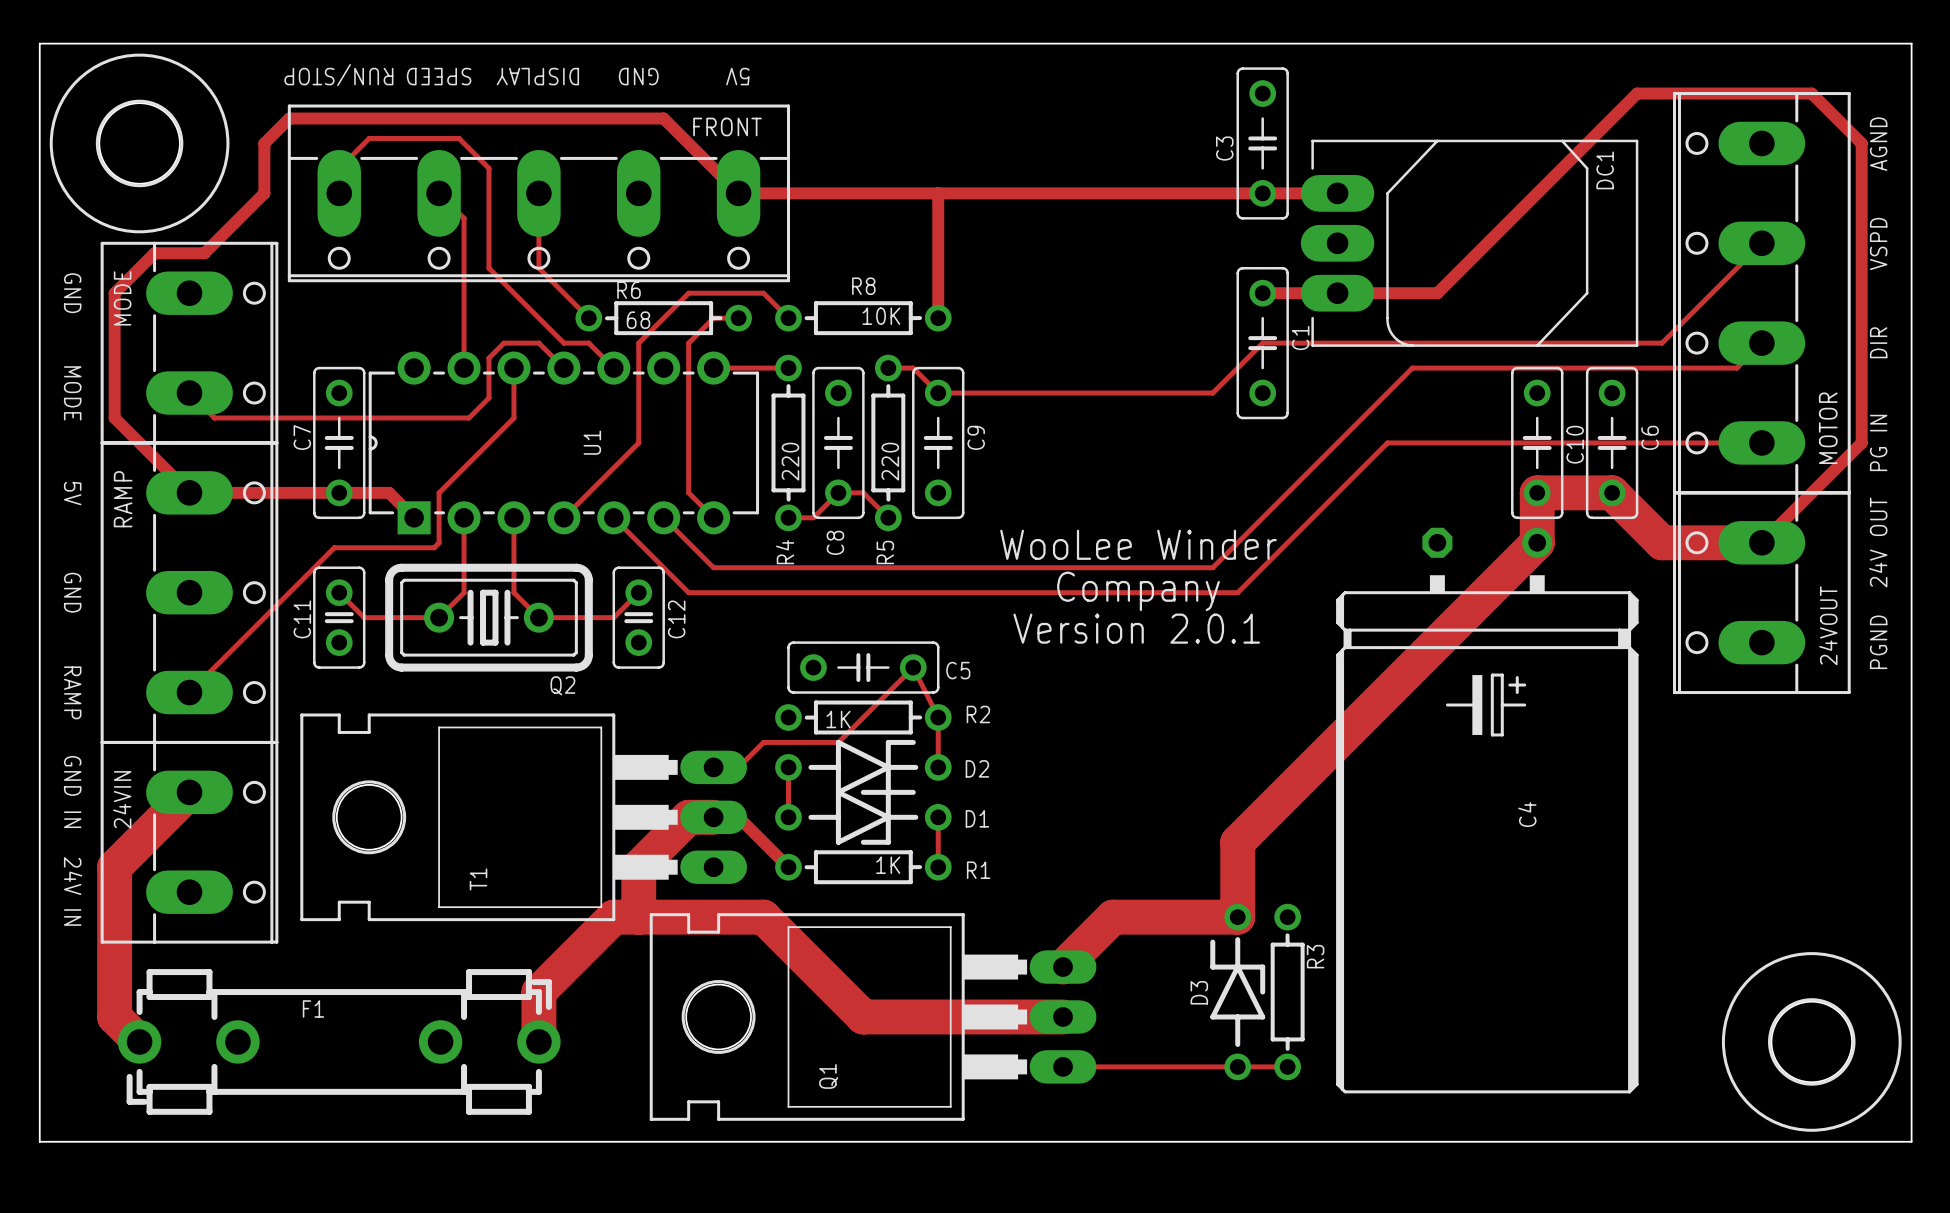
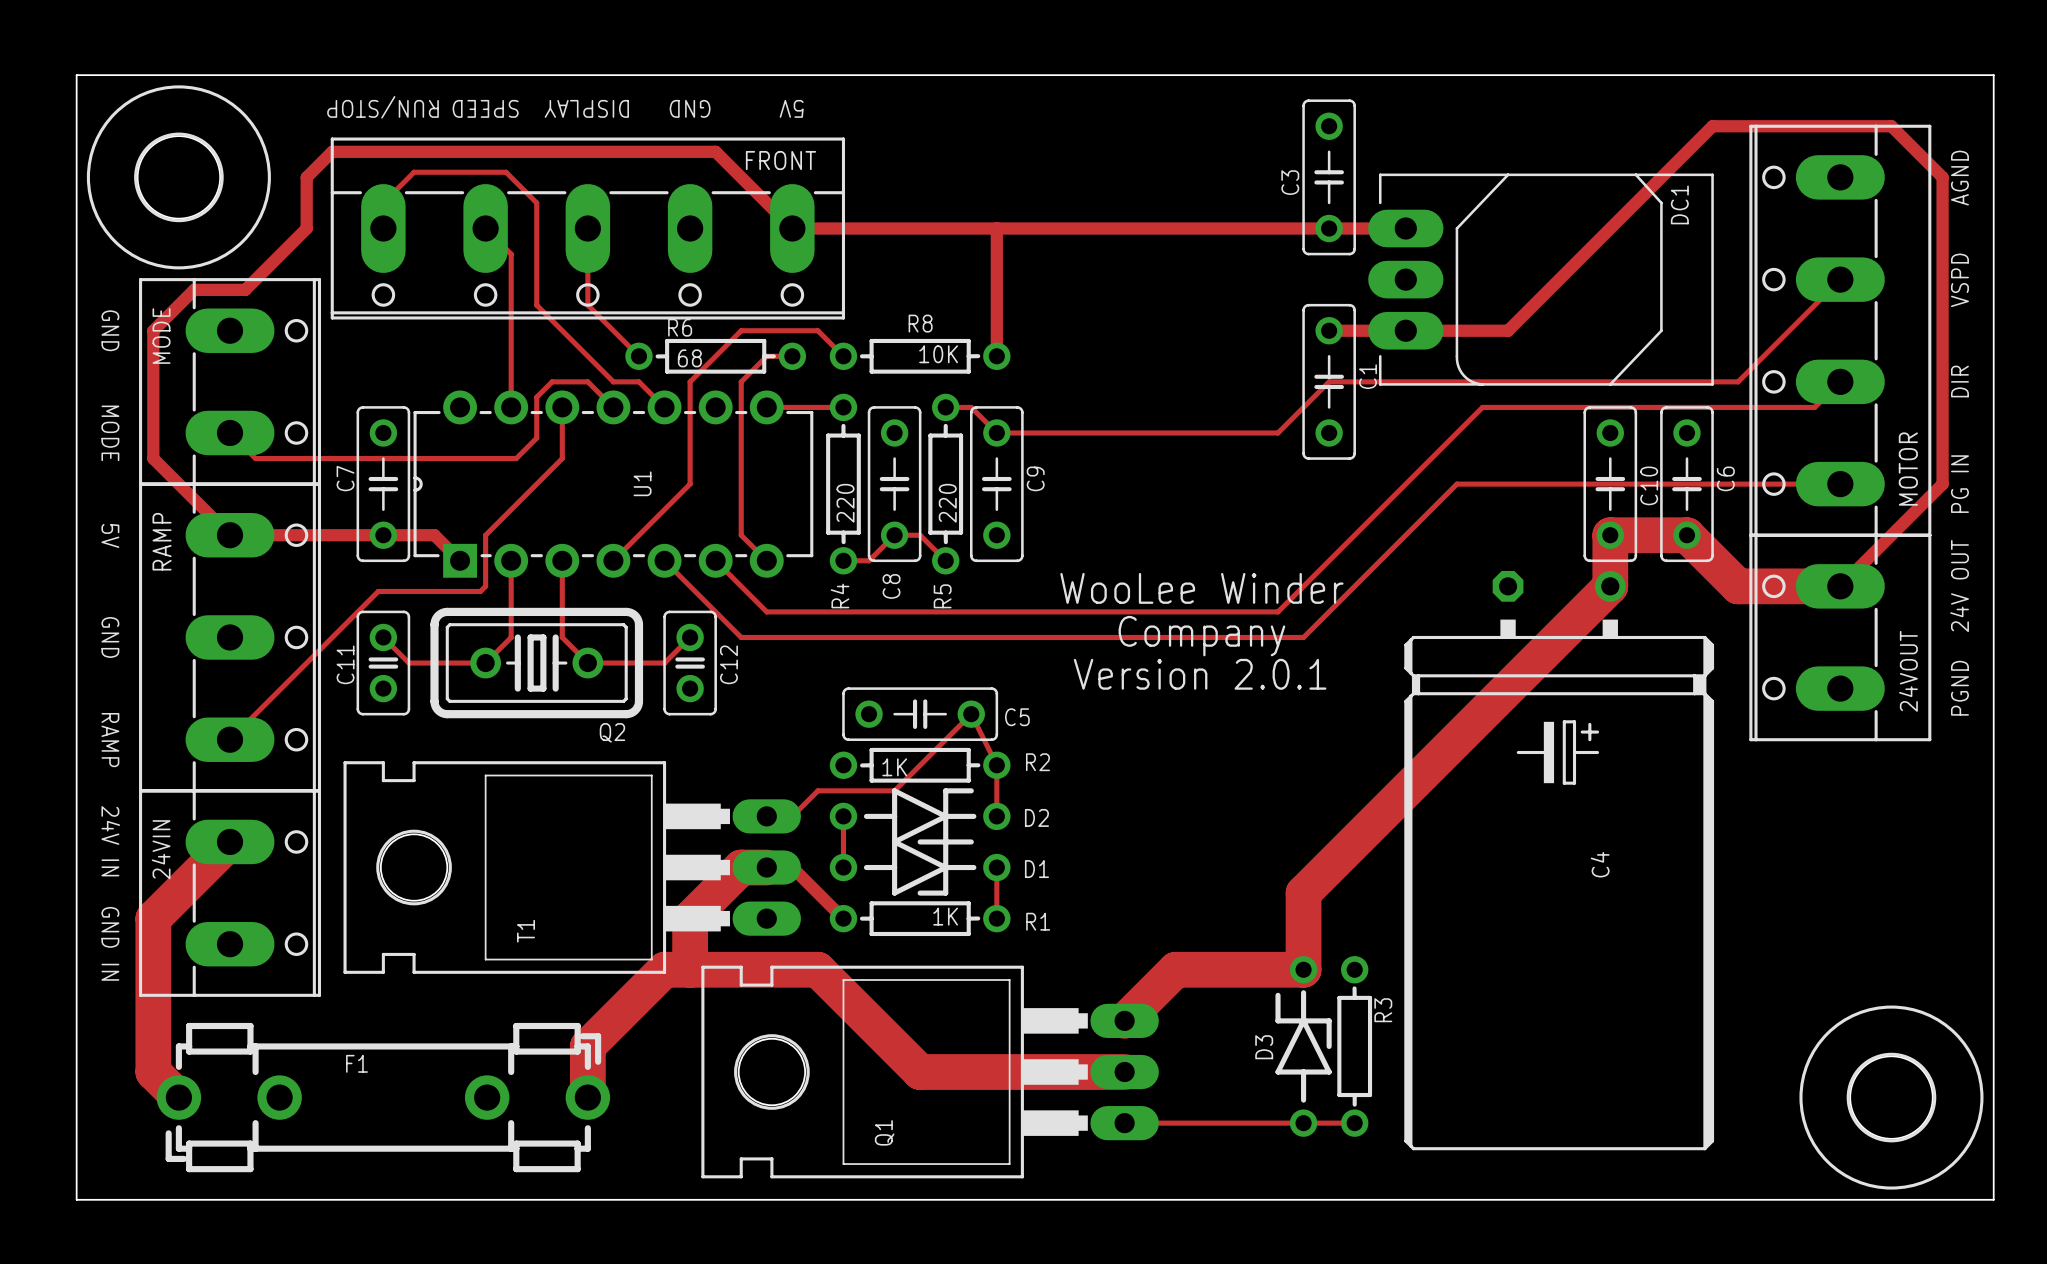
text: GND IN (72, 792) -> 24V IN (110, 841)
text: 24V IN (73, 891) -> GND IN (110, 943)

